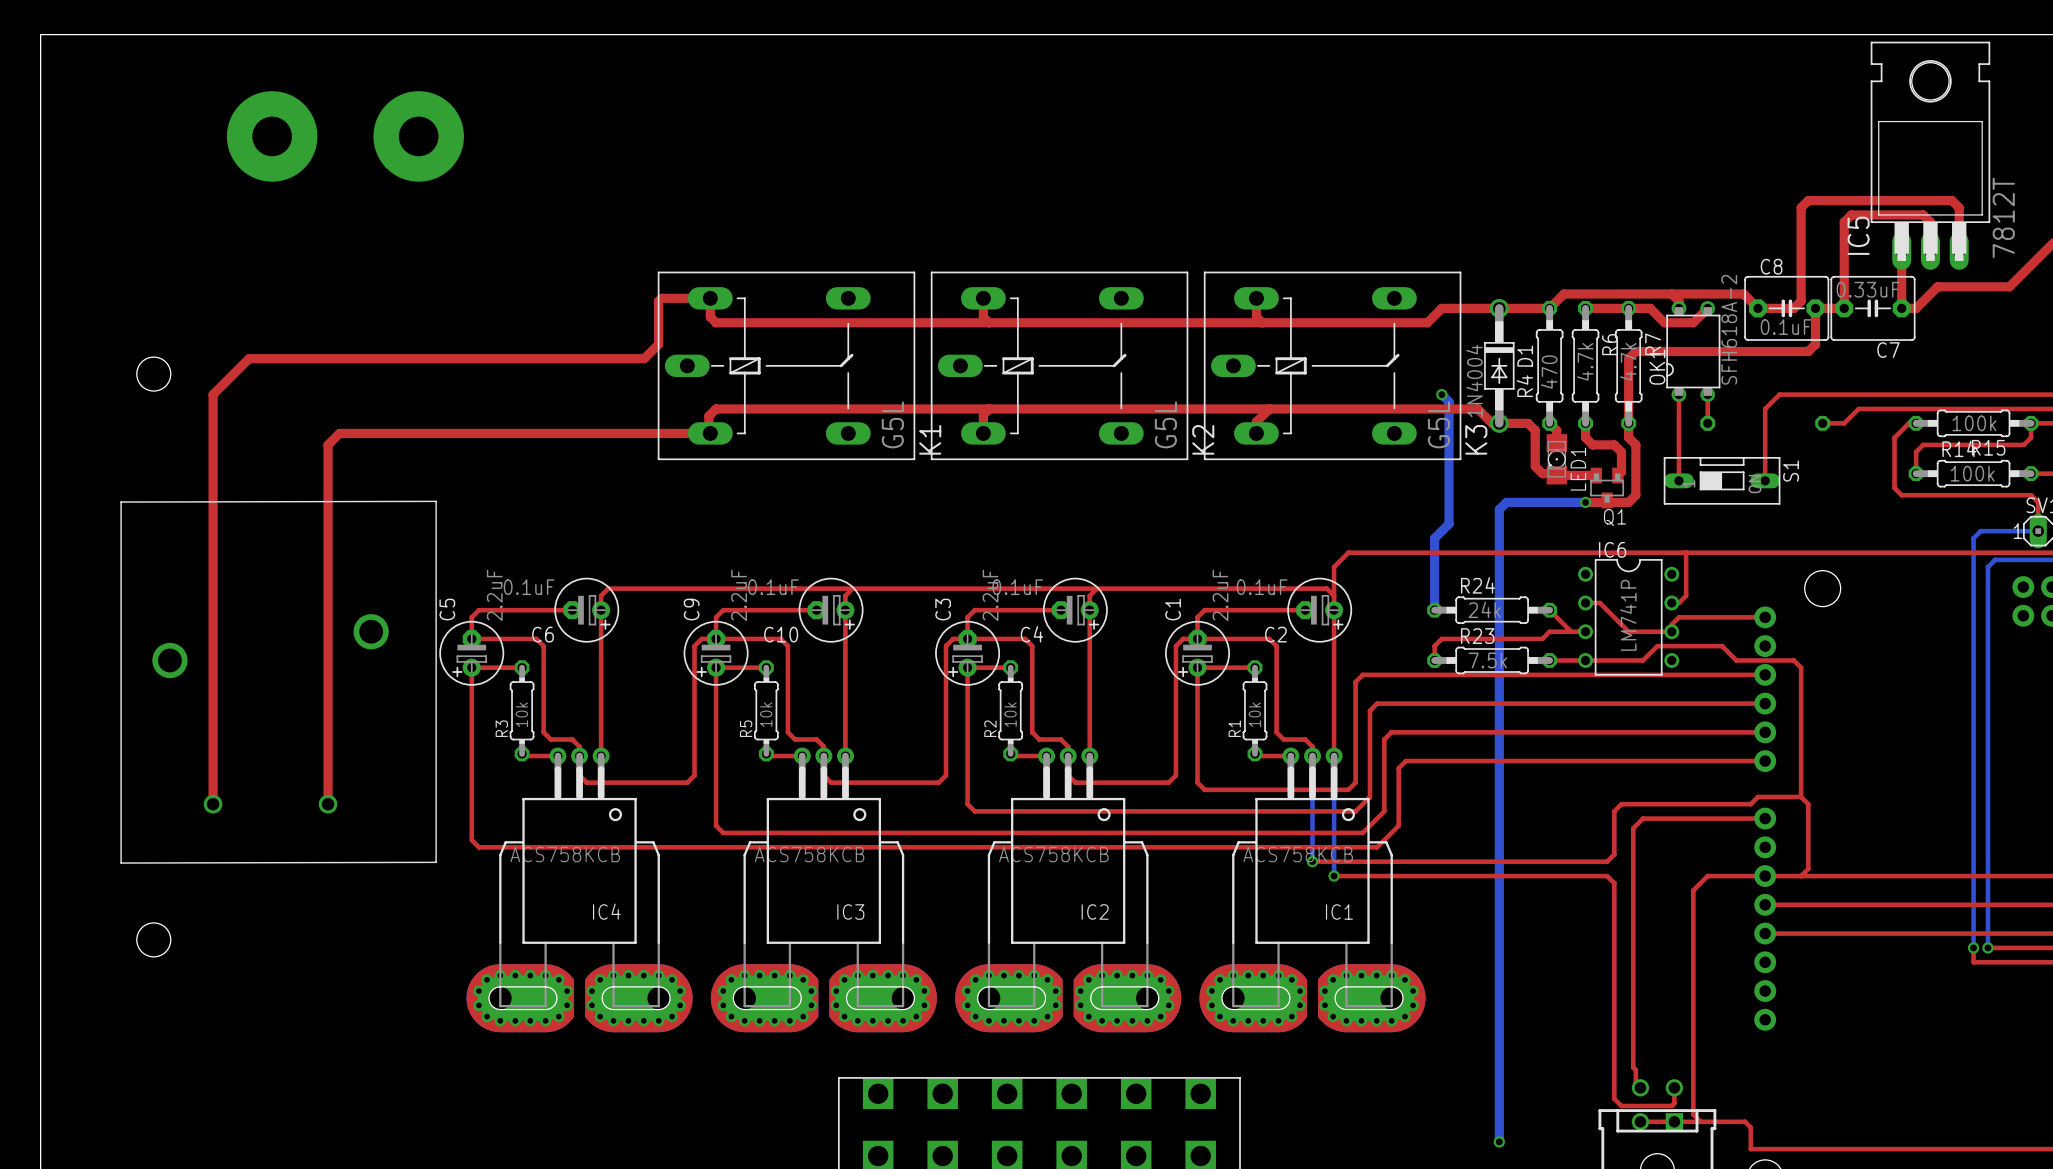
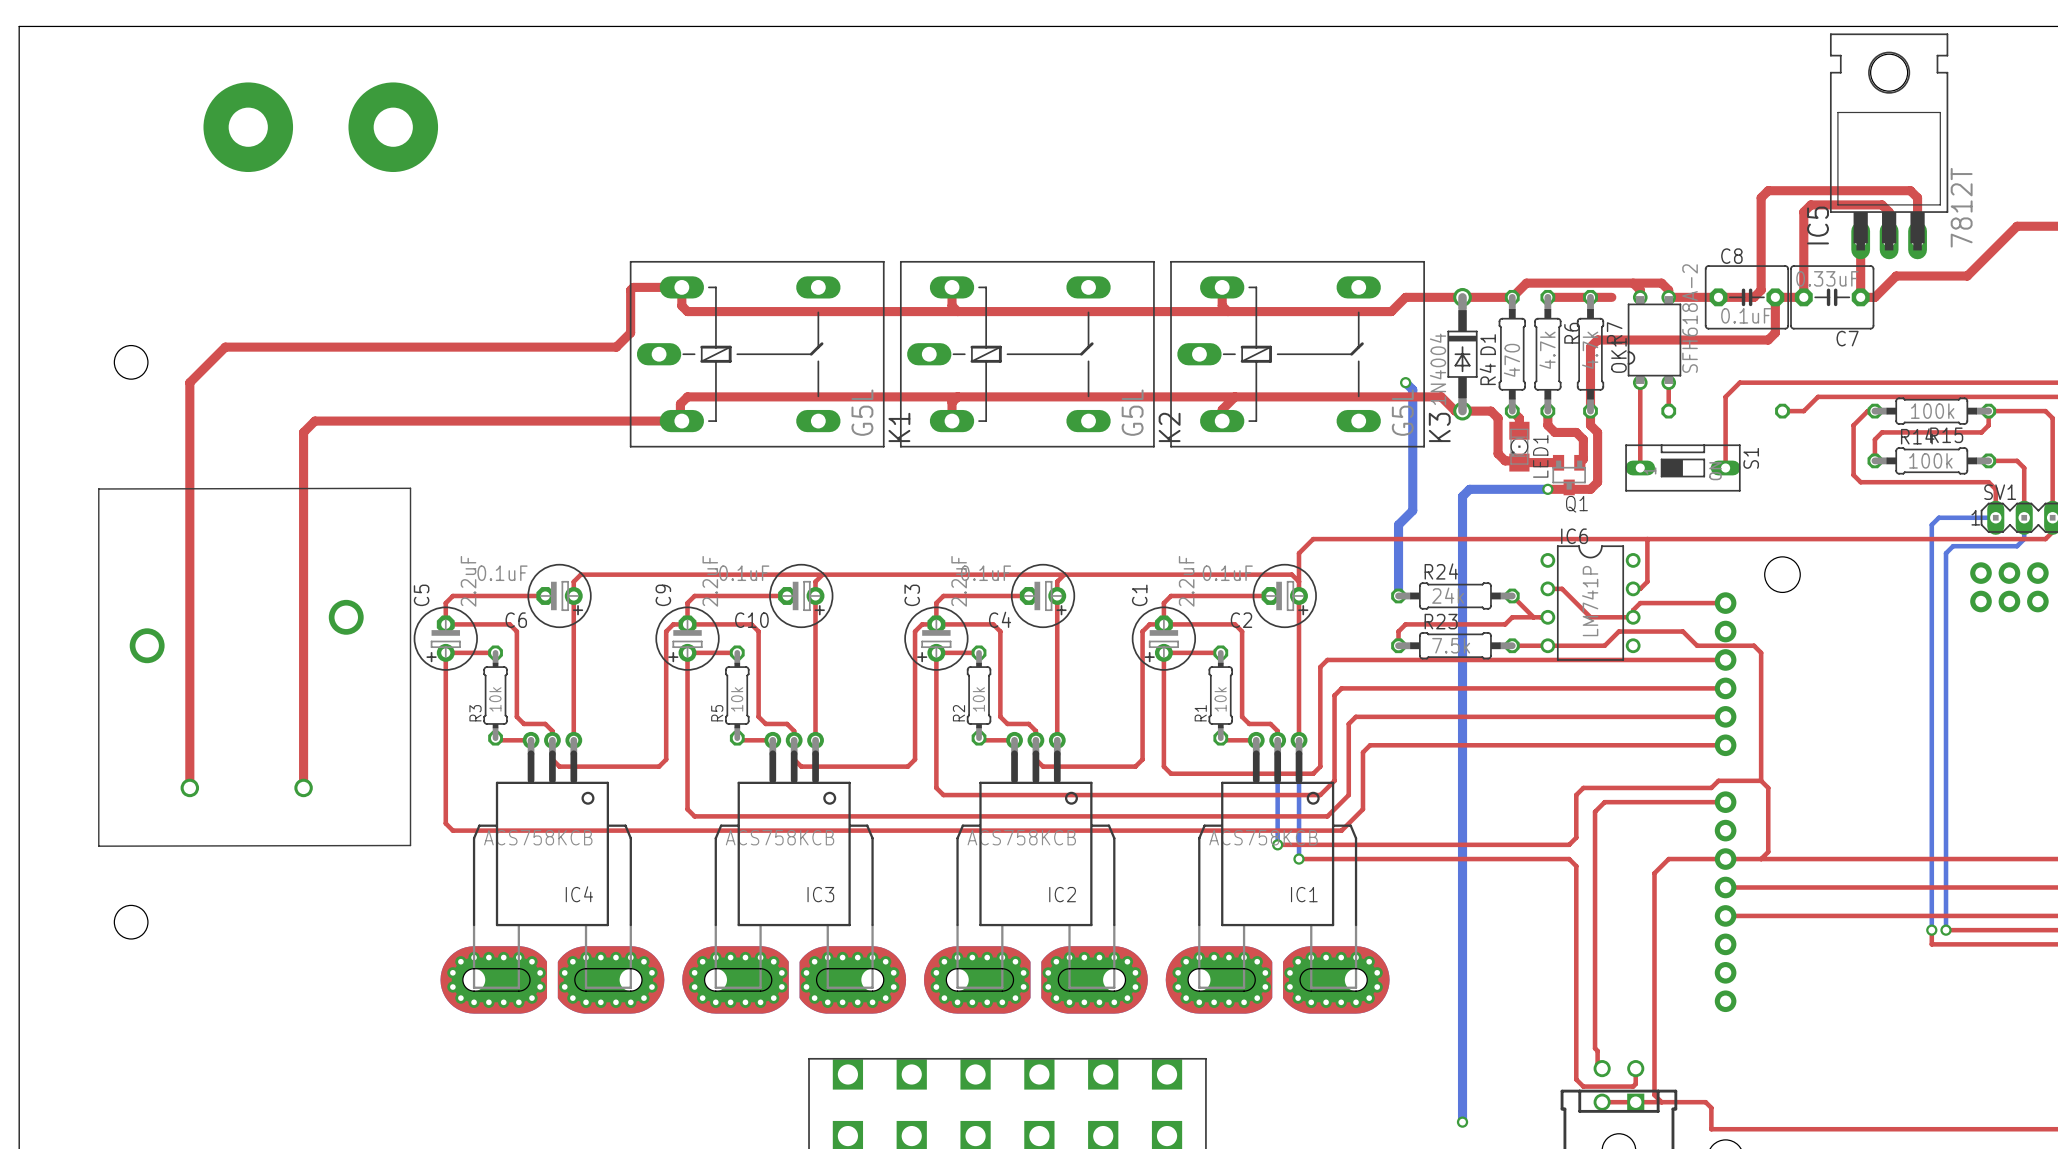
top track: (1700, 294) (1743, 294) (1758, 308) -> (1661, 283) (1668, 290) (1668, 297) (1718, 297)
top track: (1650, 308) (1664, 322) (1693, 322) (1707, 308) -> none

